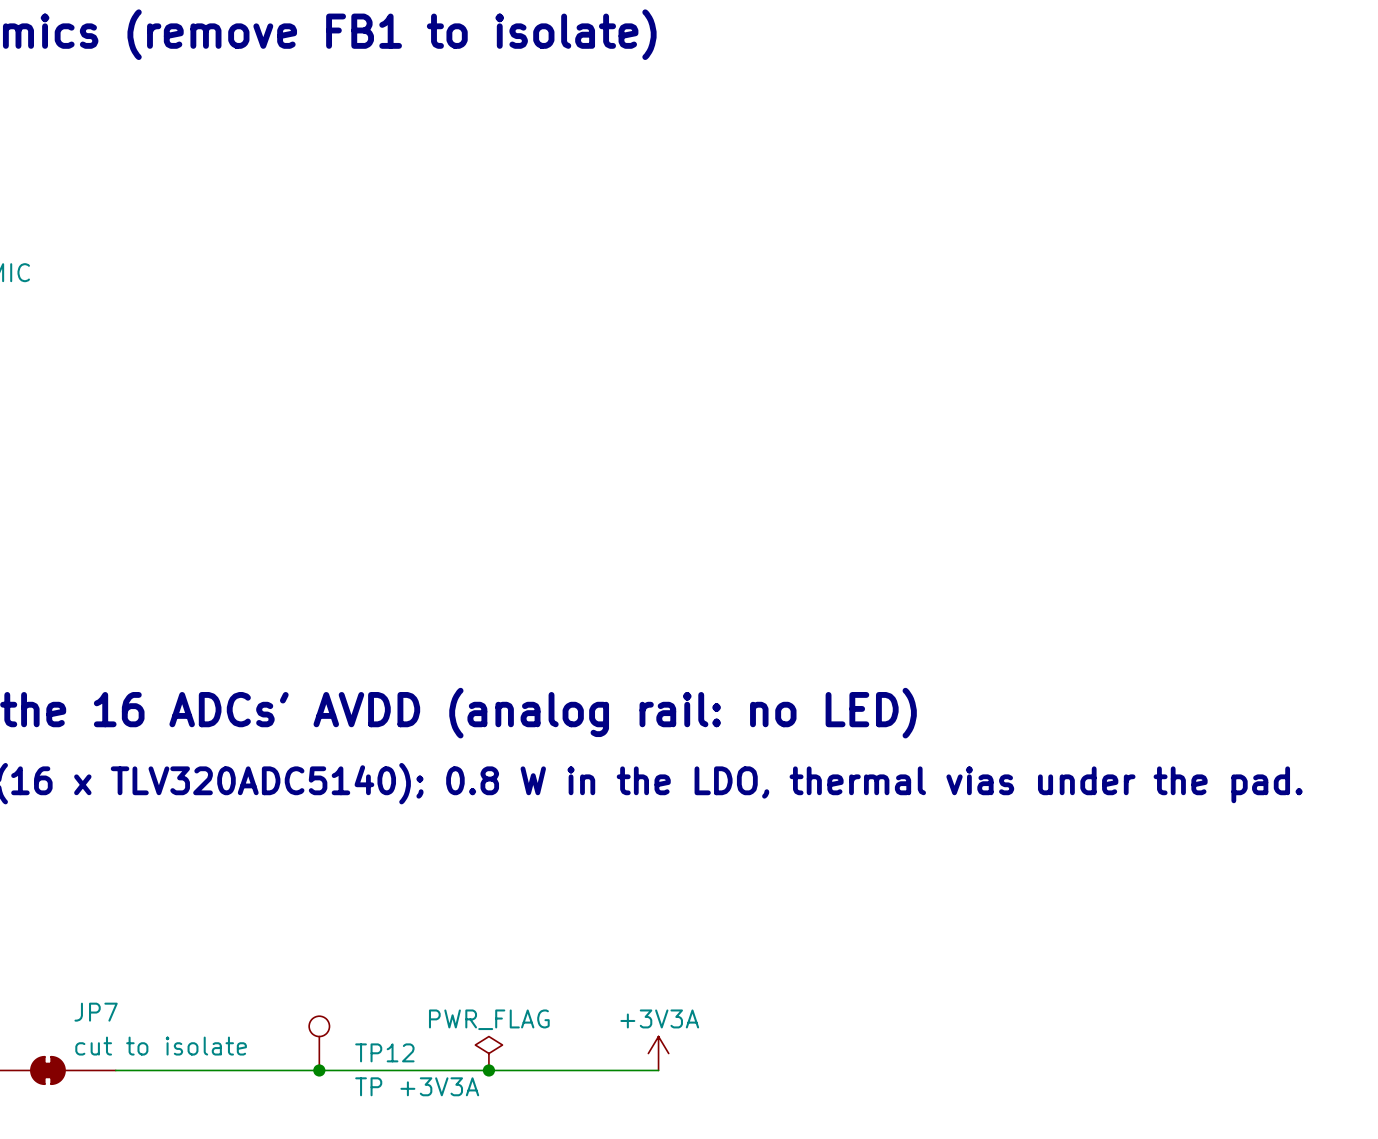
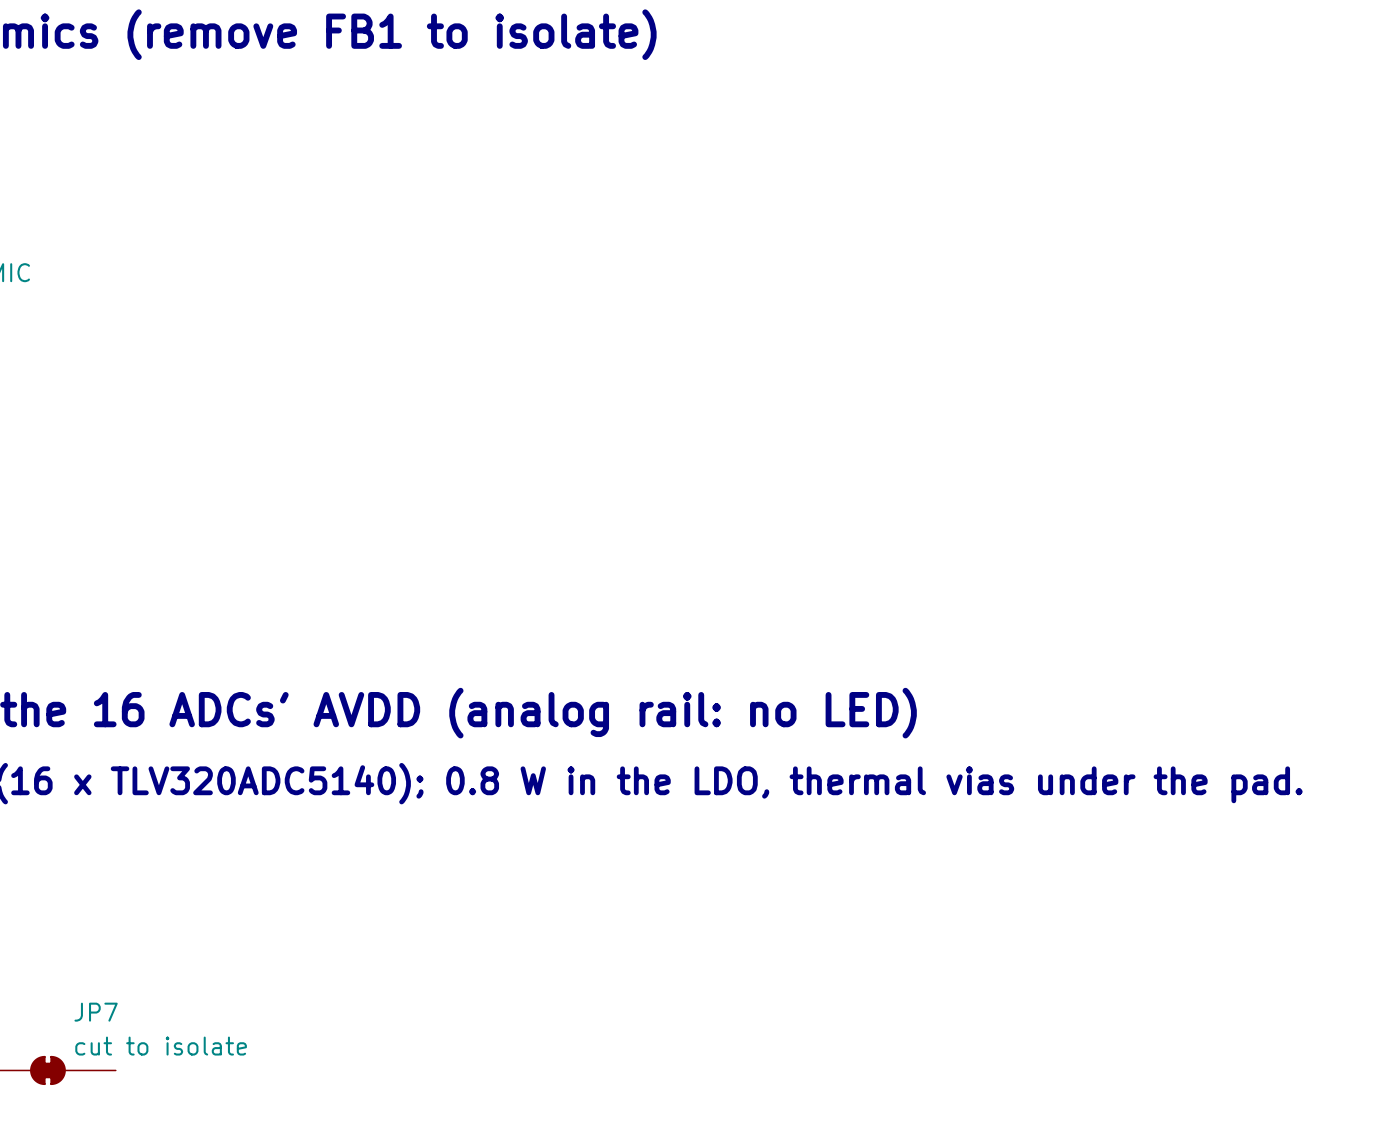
TP12: TP +3V3A (319, 1043) -> none
power symbol: PWR_FLAG (488, 1053) -> none
power symbol: +3V3A (658, 1053) -> none
wire: (115, 1070) (658, 1070) -> none
junction: (319, 1070) -> none
junction: (488, 1070) -> none

